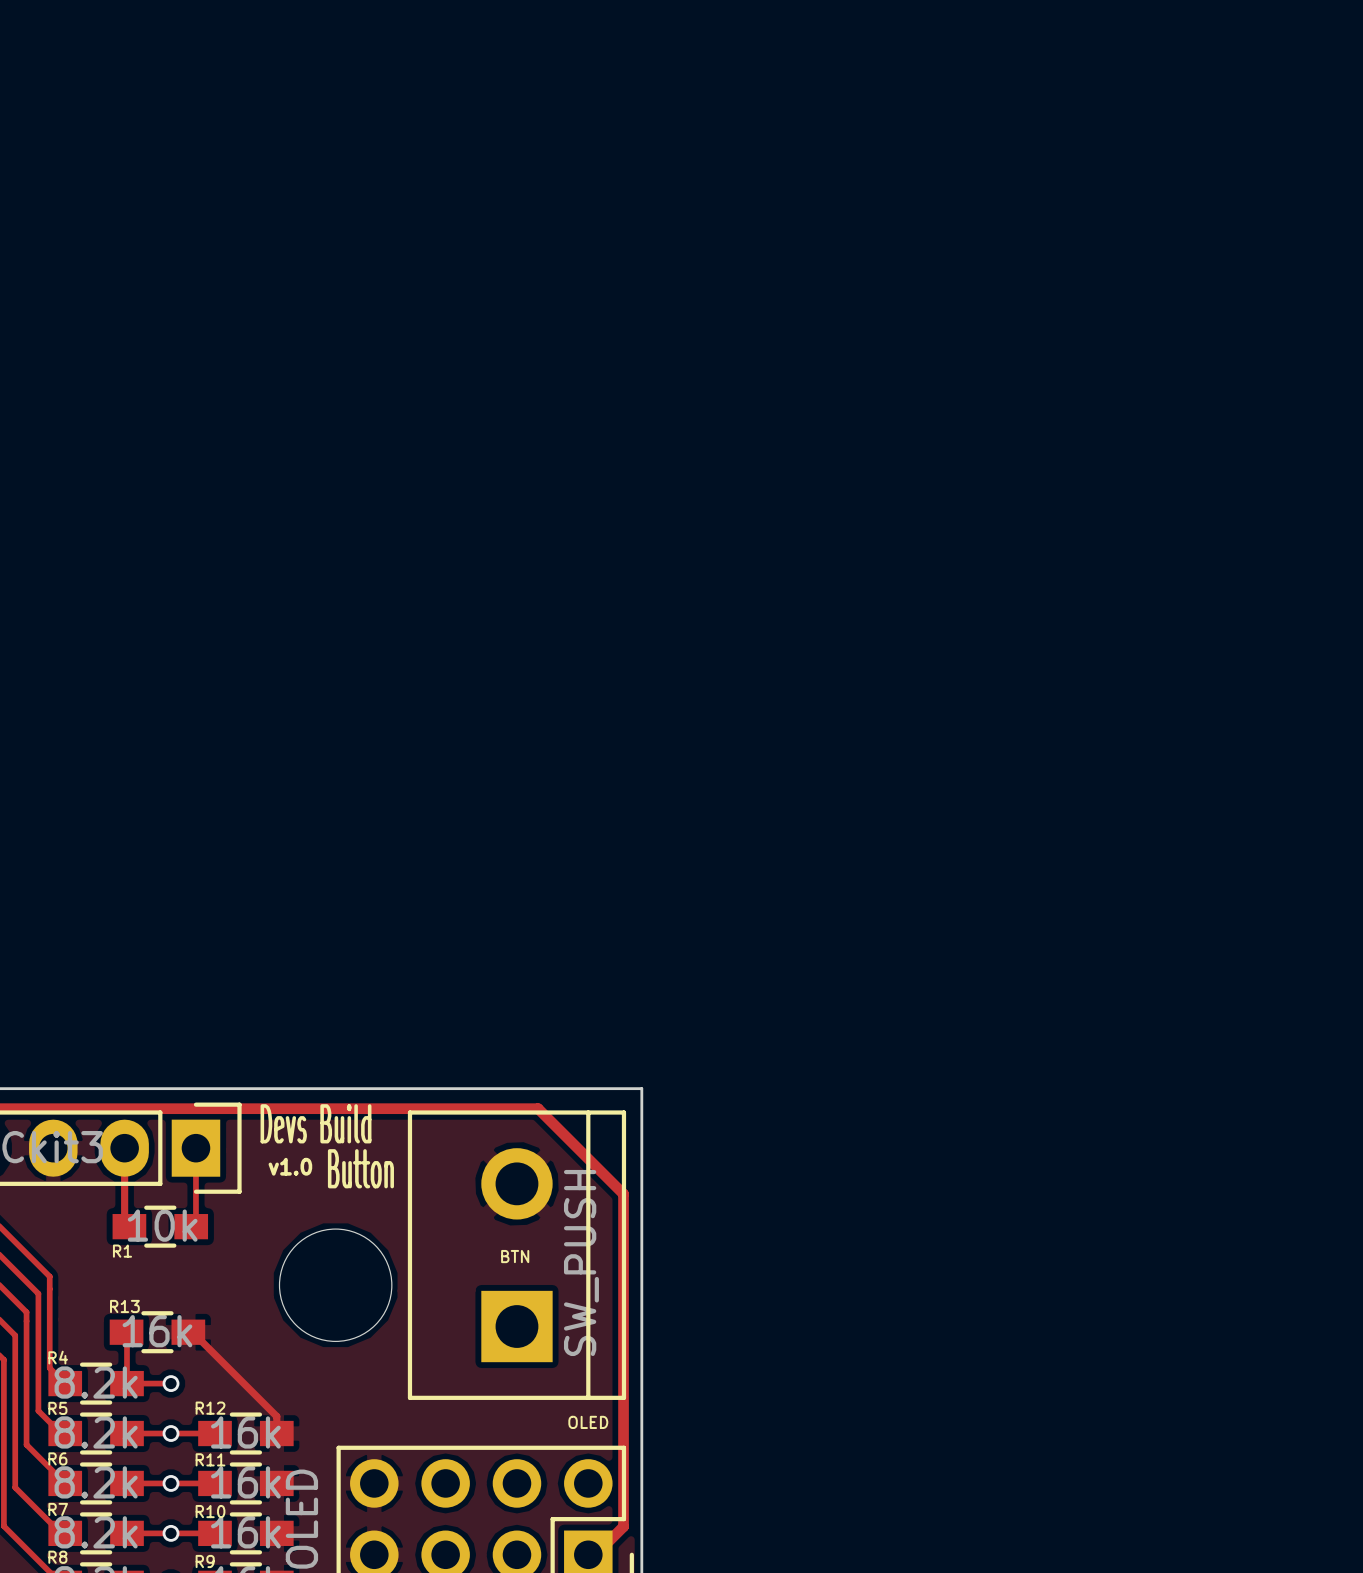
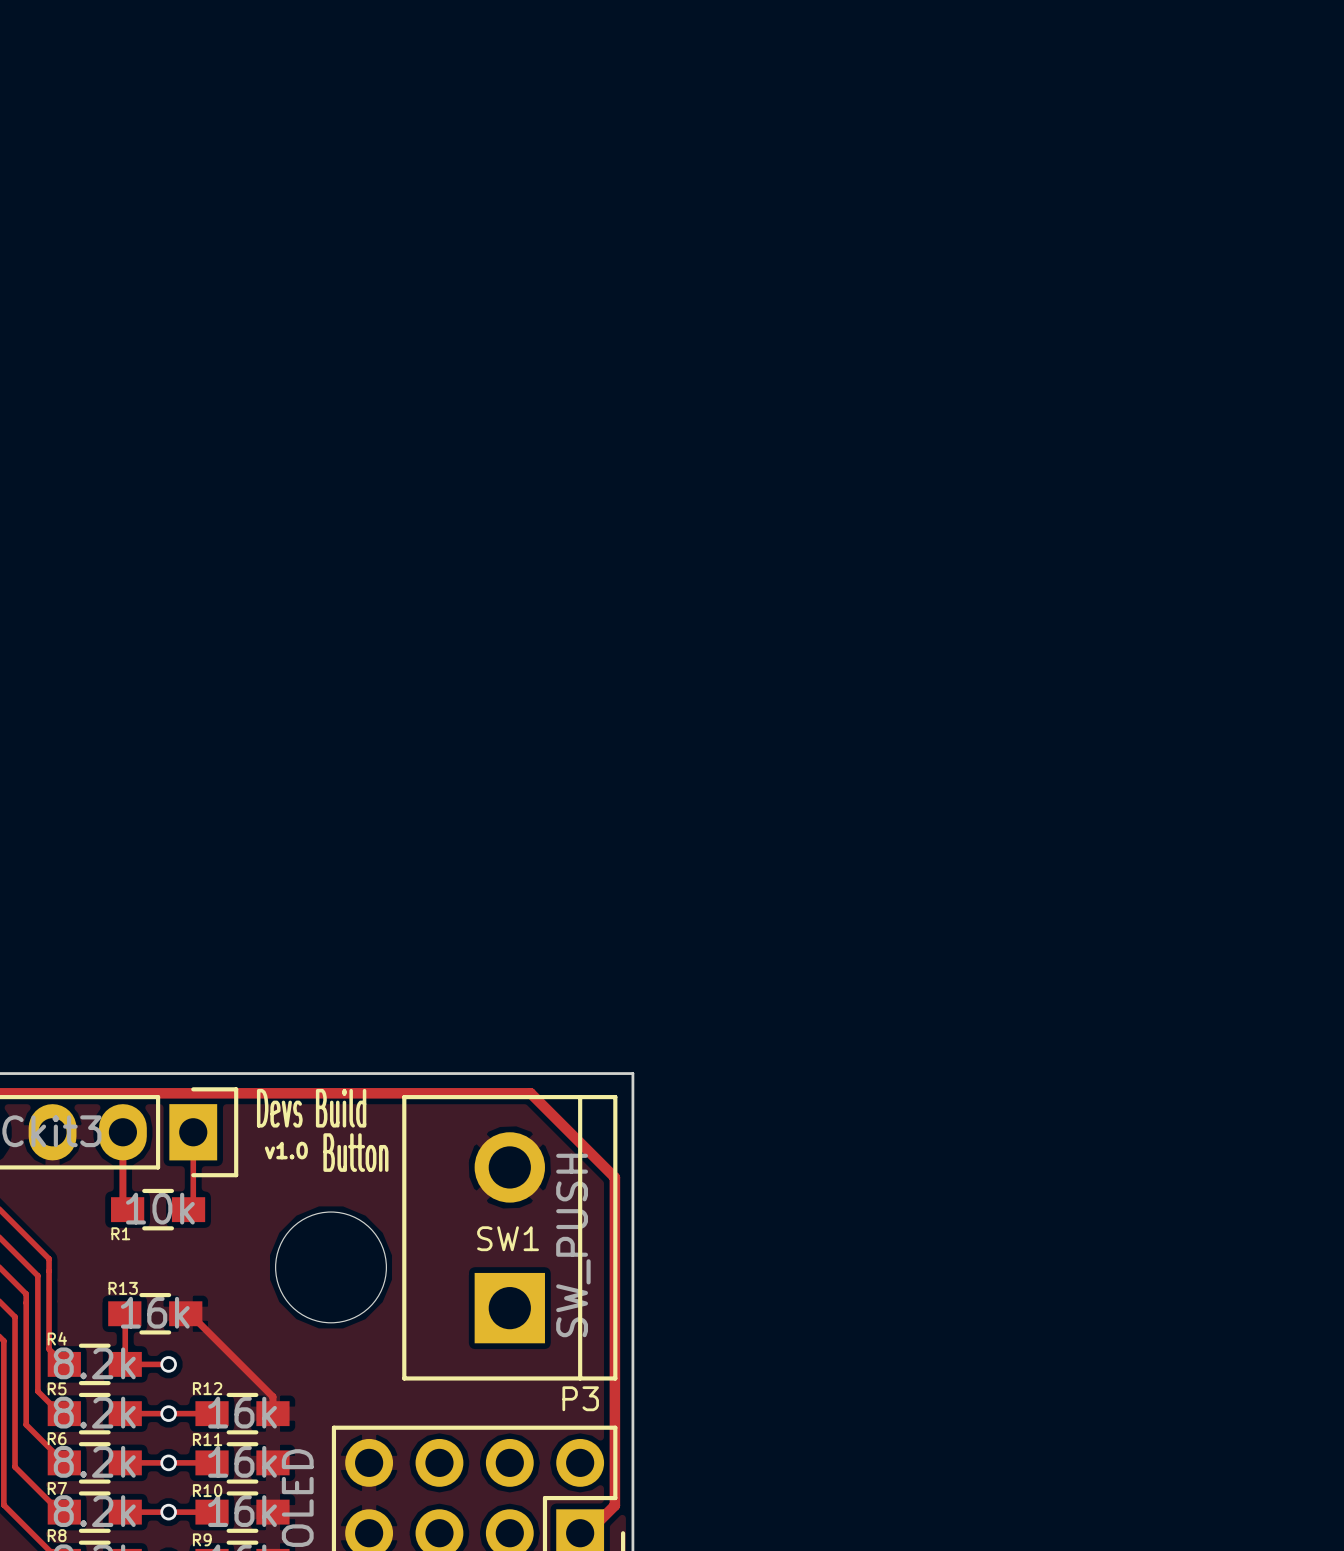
BTN name: BTN (515, 1256) -> SW1 (508, 1238)
OLED name: OLED (588, 1422) -> P3 (580, 1398)

